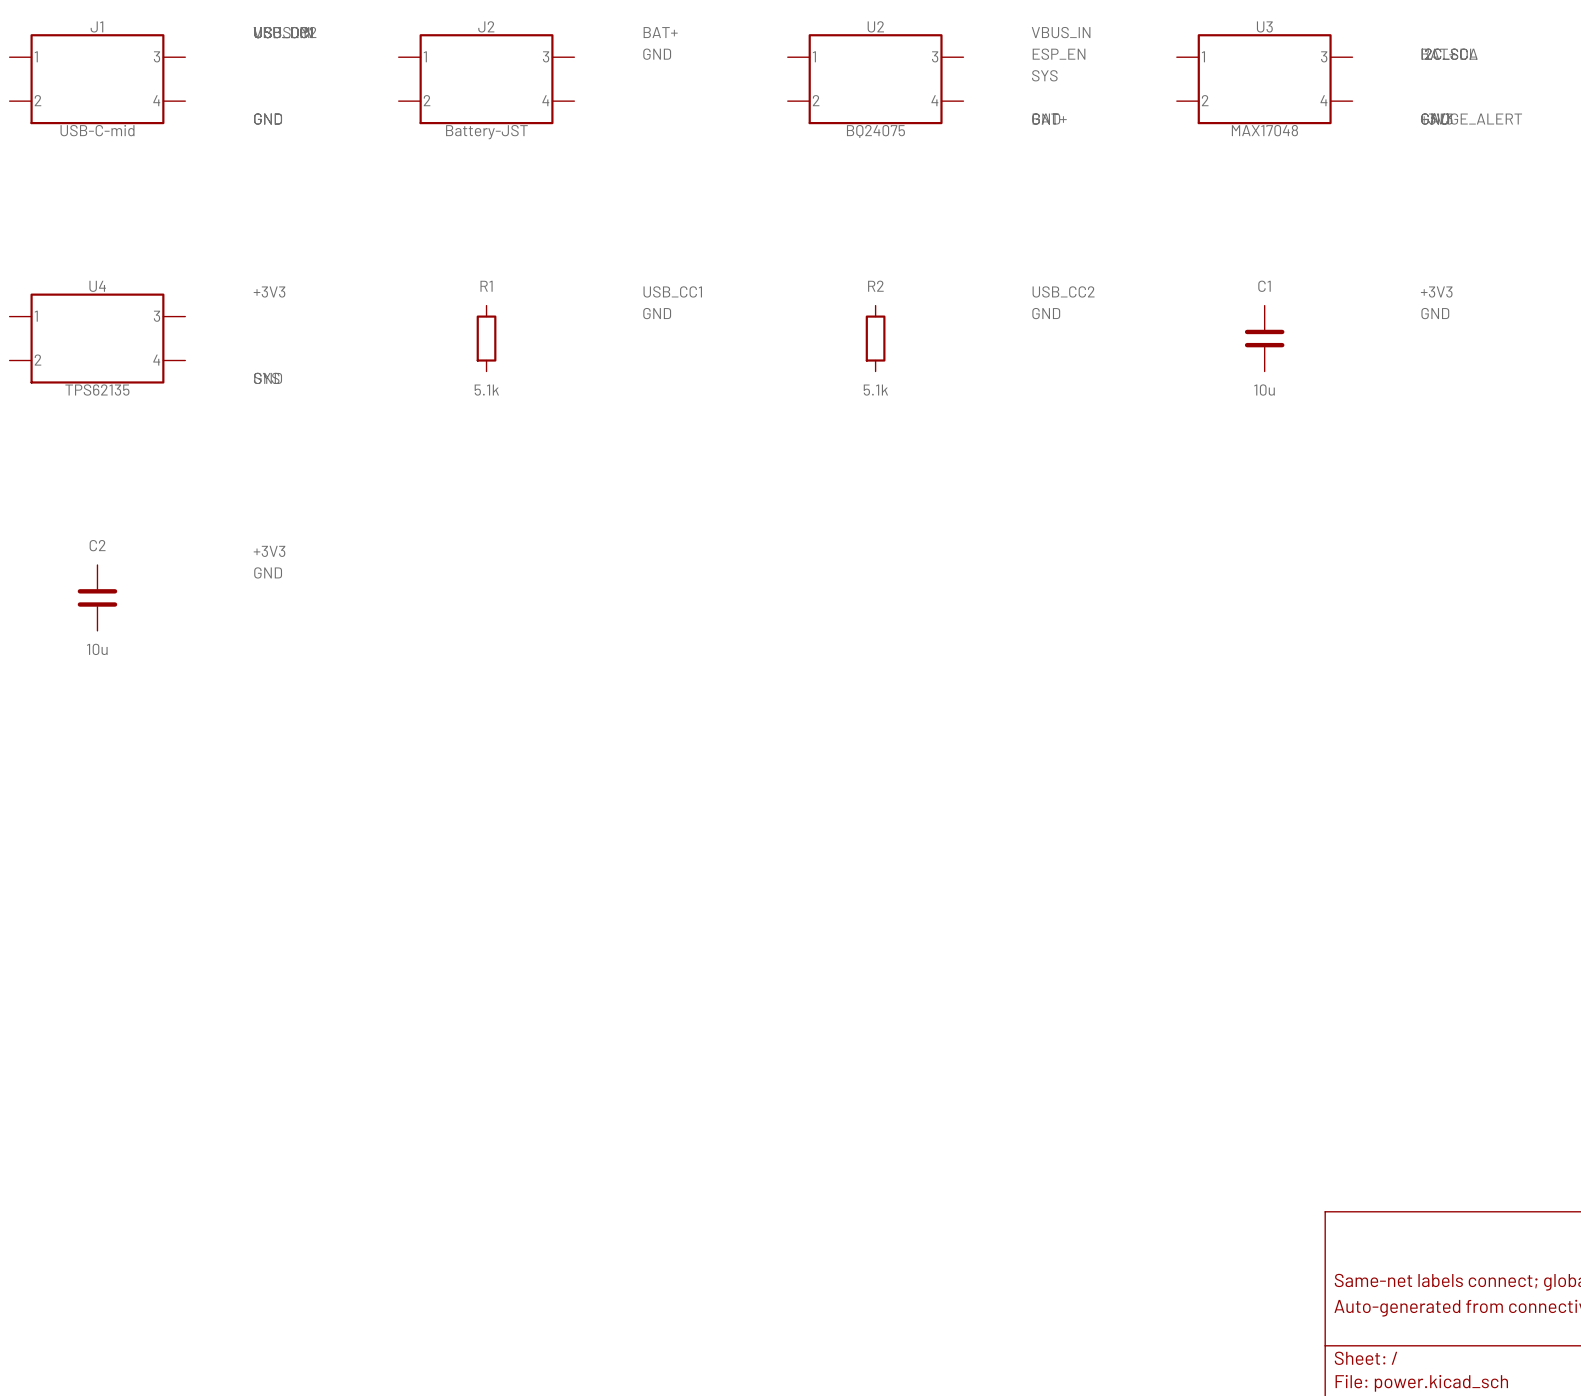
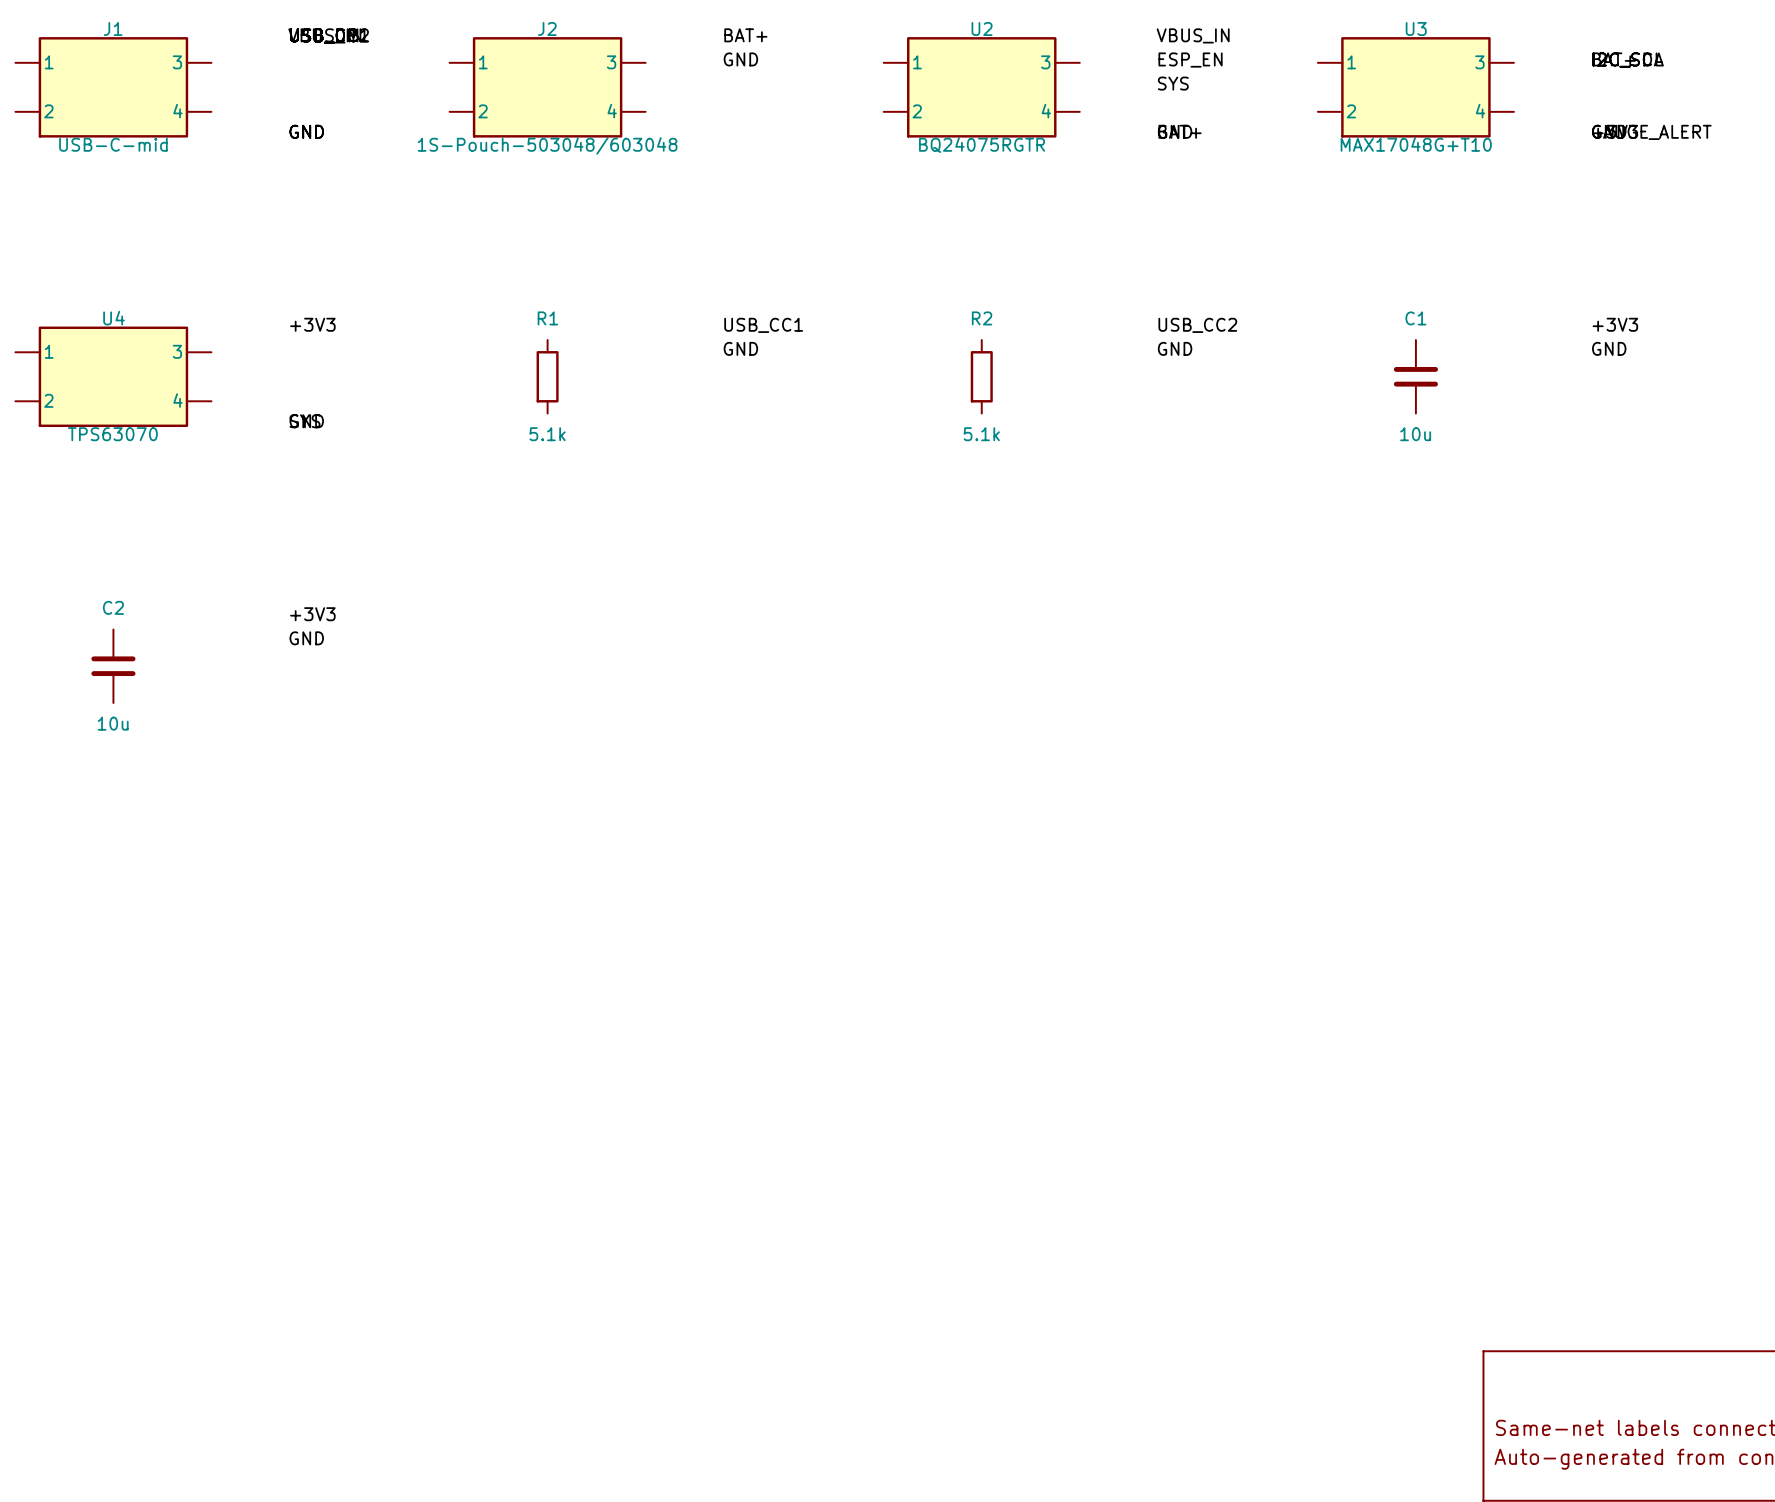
U3 value: MAX17048 (1264, 130) -> MAX17048G+T10 (1416, 144)
U2 value: BQ24075 (875, 131) -> BQ24075RGTR (982, 145)
J2 value: Battery-JST (486, 132) -> 1S-Pouch-503048/603048 (547, 145)
U4 value: TPS62135 (97, 390) -> TPS63070 (112, 434)

